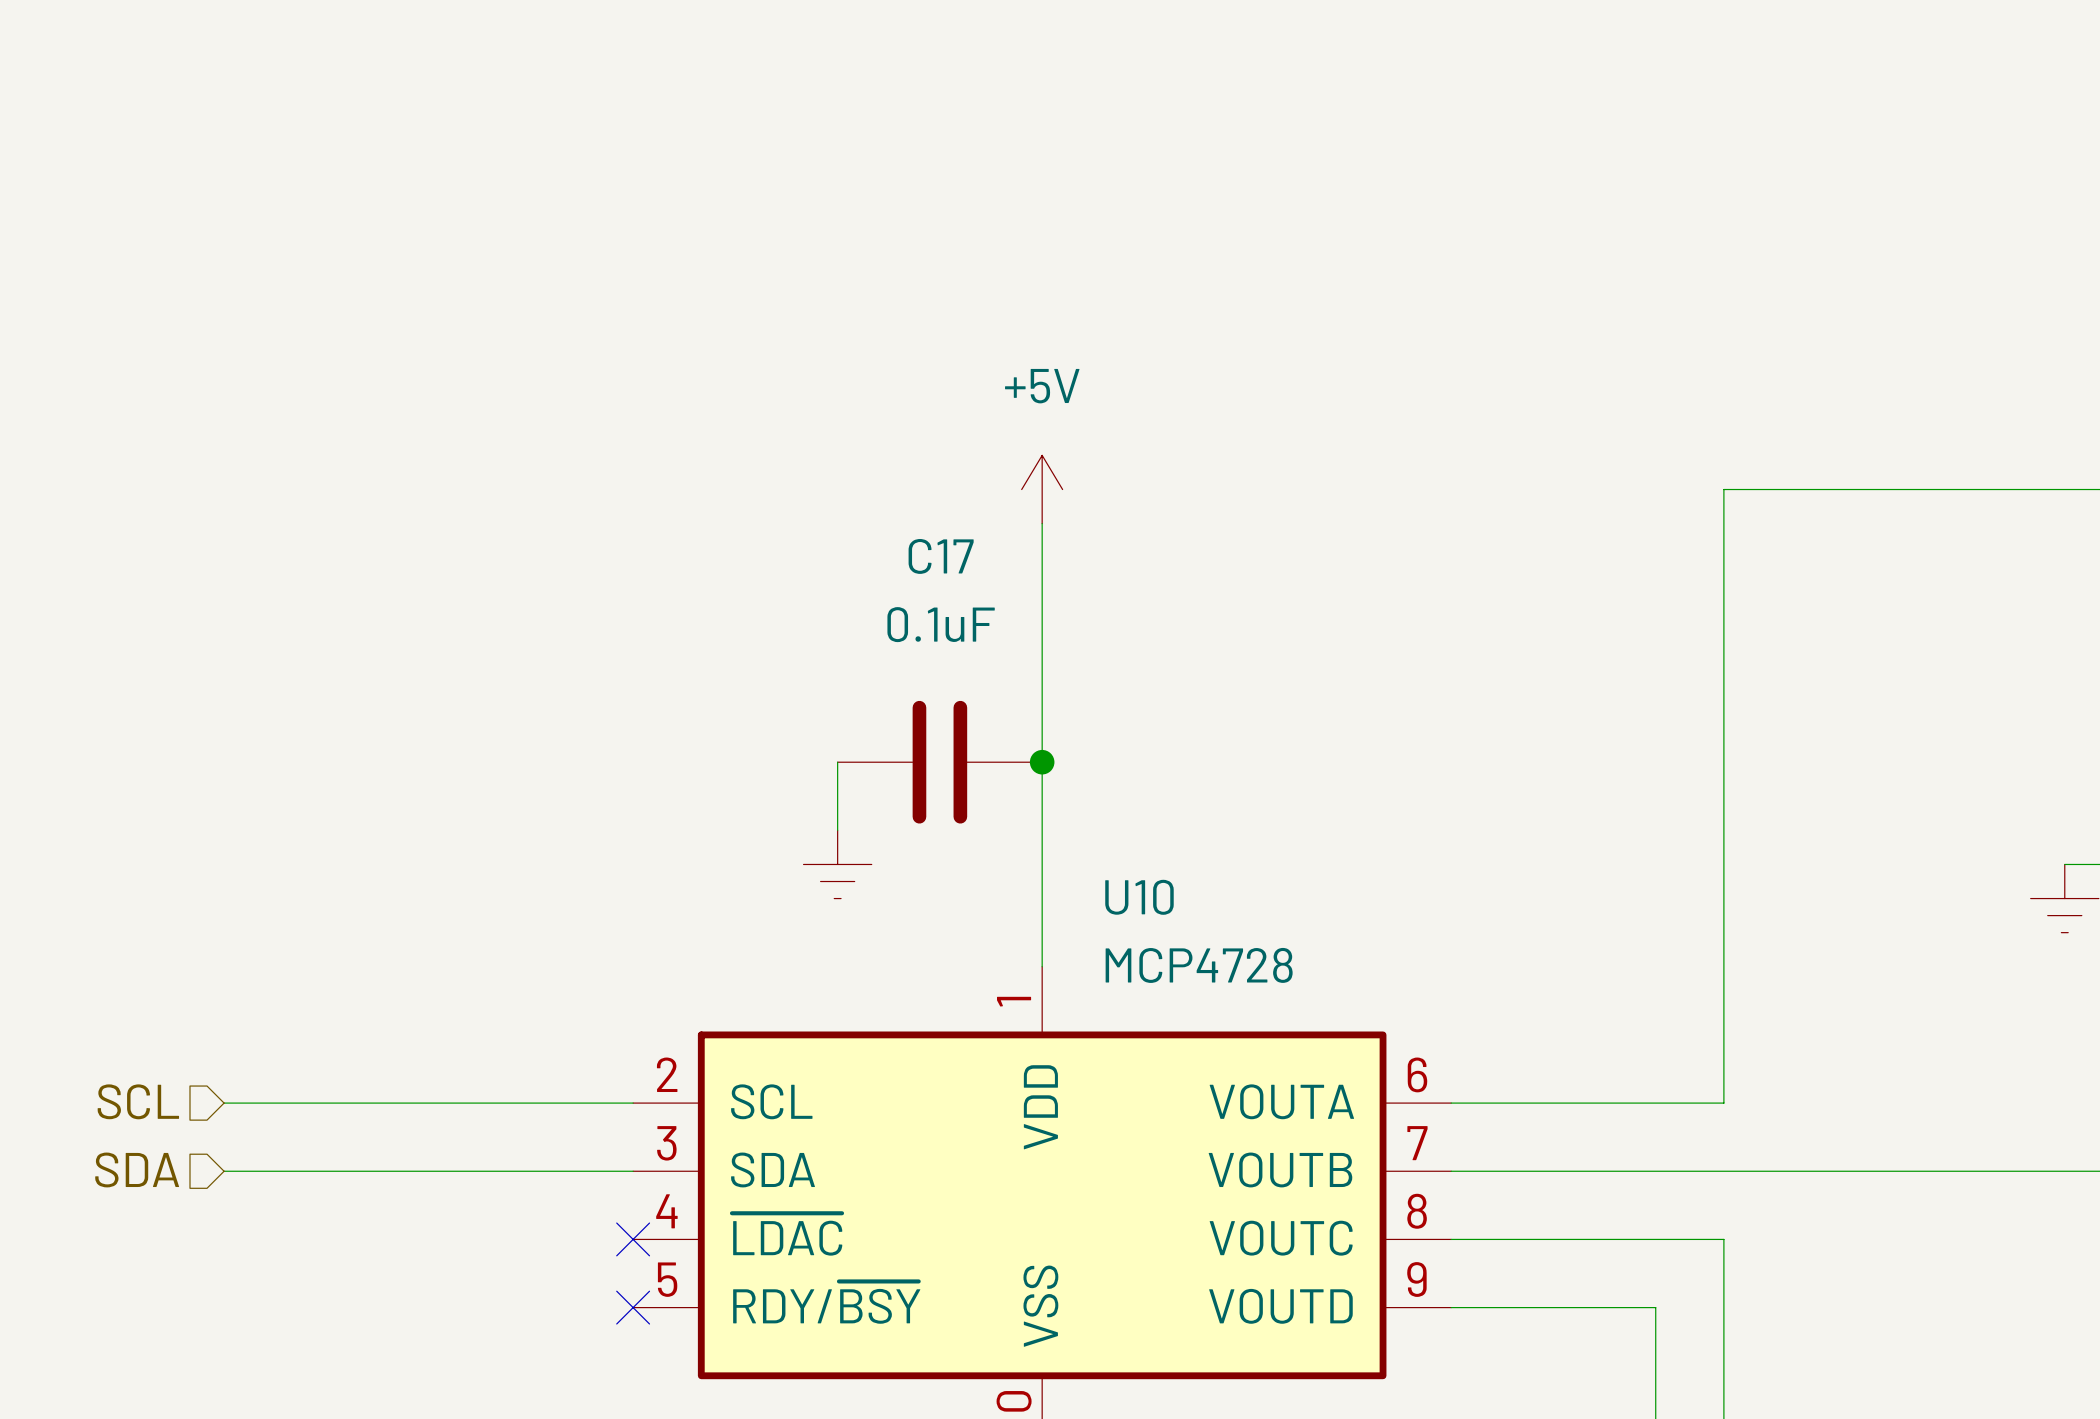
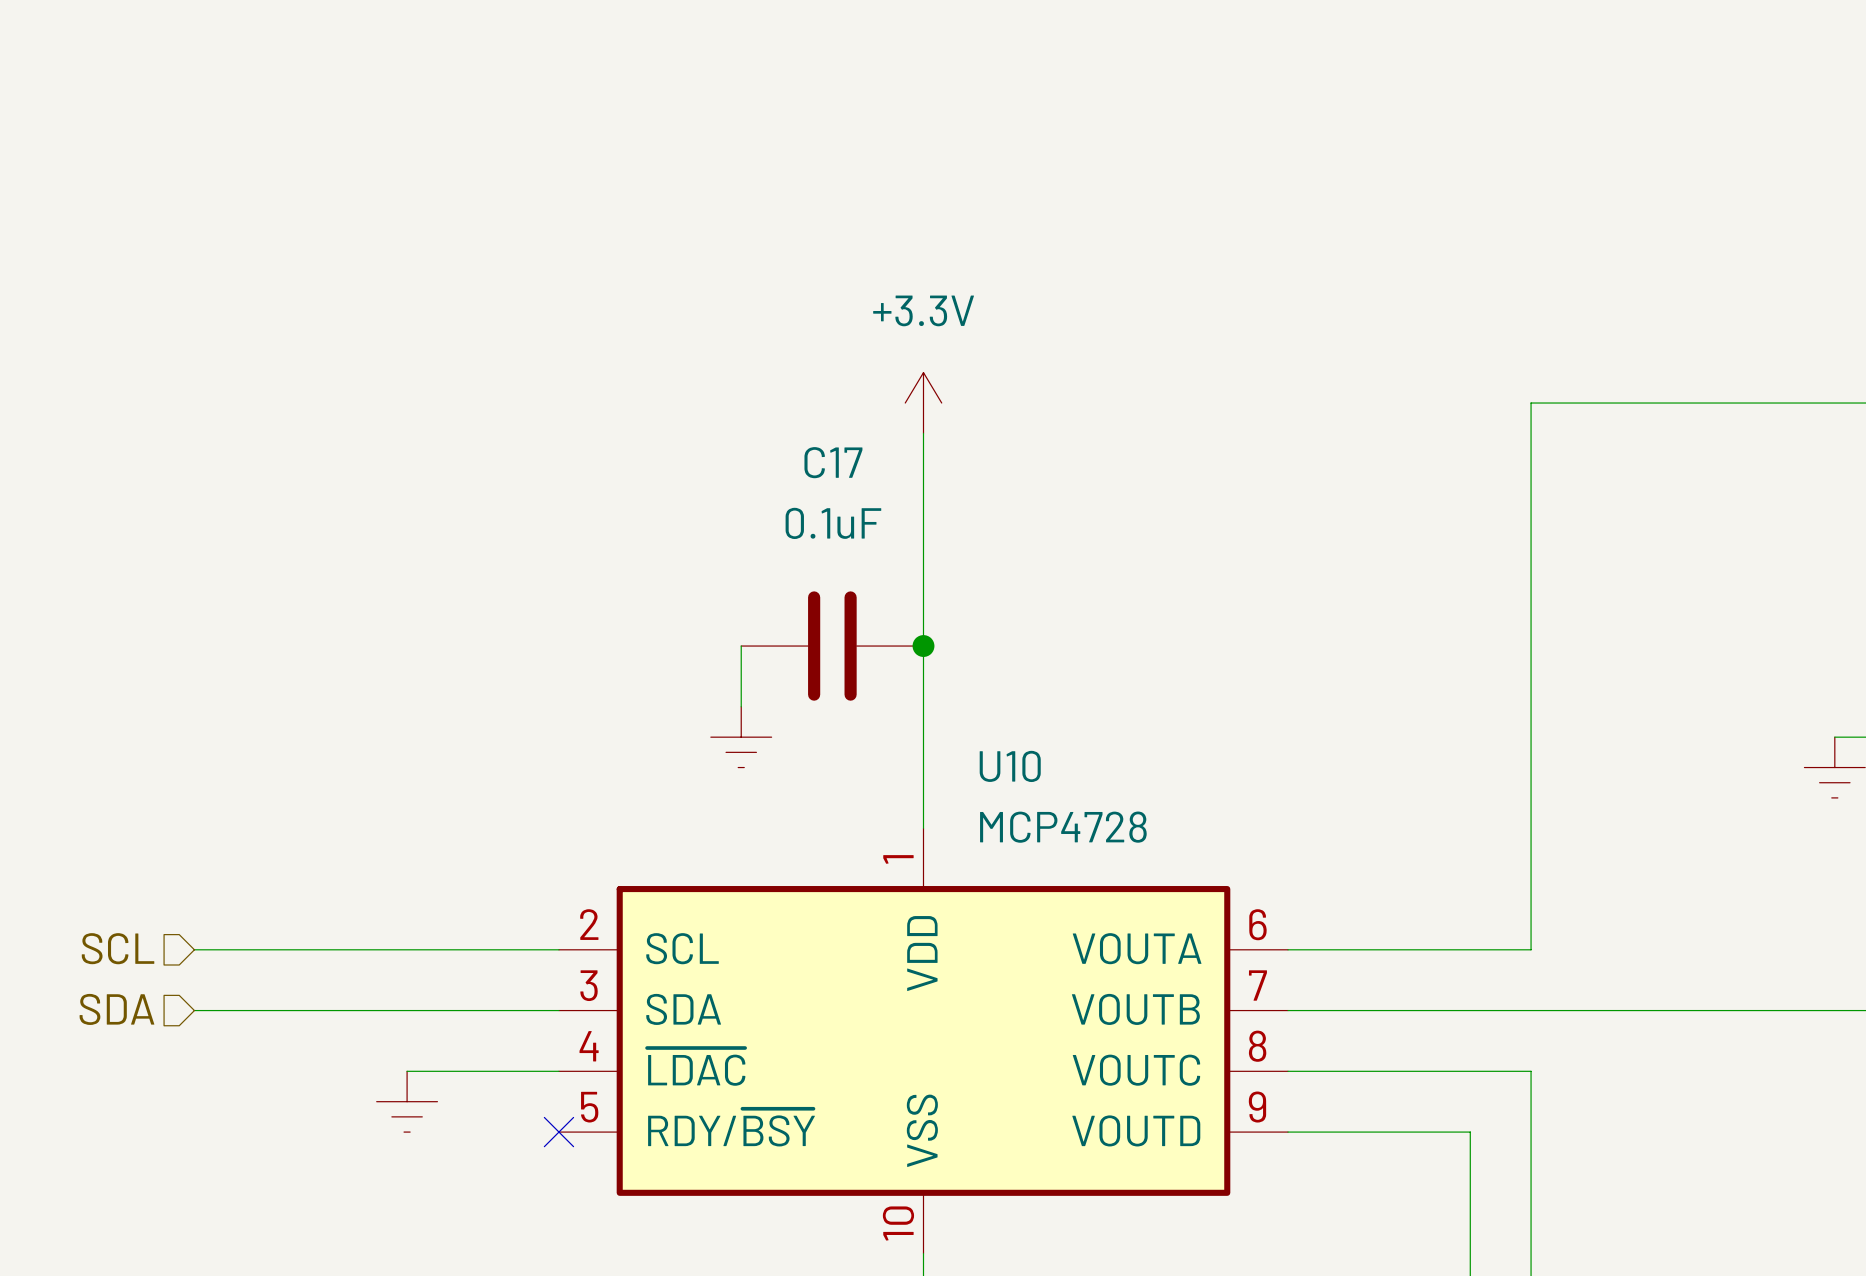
power symbol: +5V (1042, 489) -> +3.3V (923, 403)
wire: none -> (407, 1071) (558, 1071)
no-connect mark: (633, 1239) -> none
power symbol: none -> (407, 1101)

